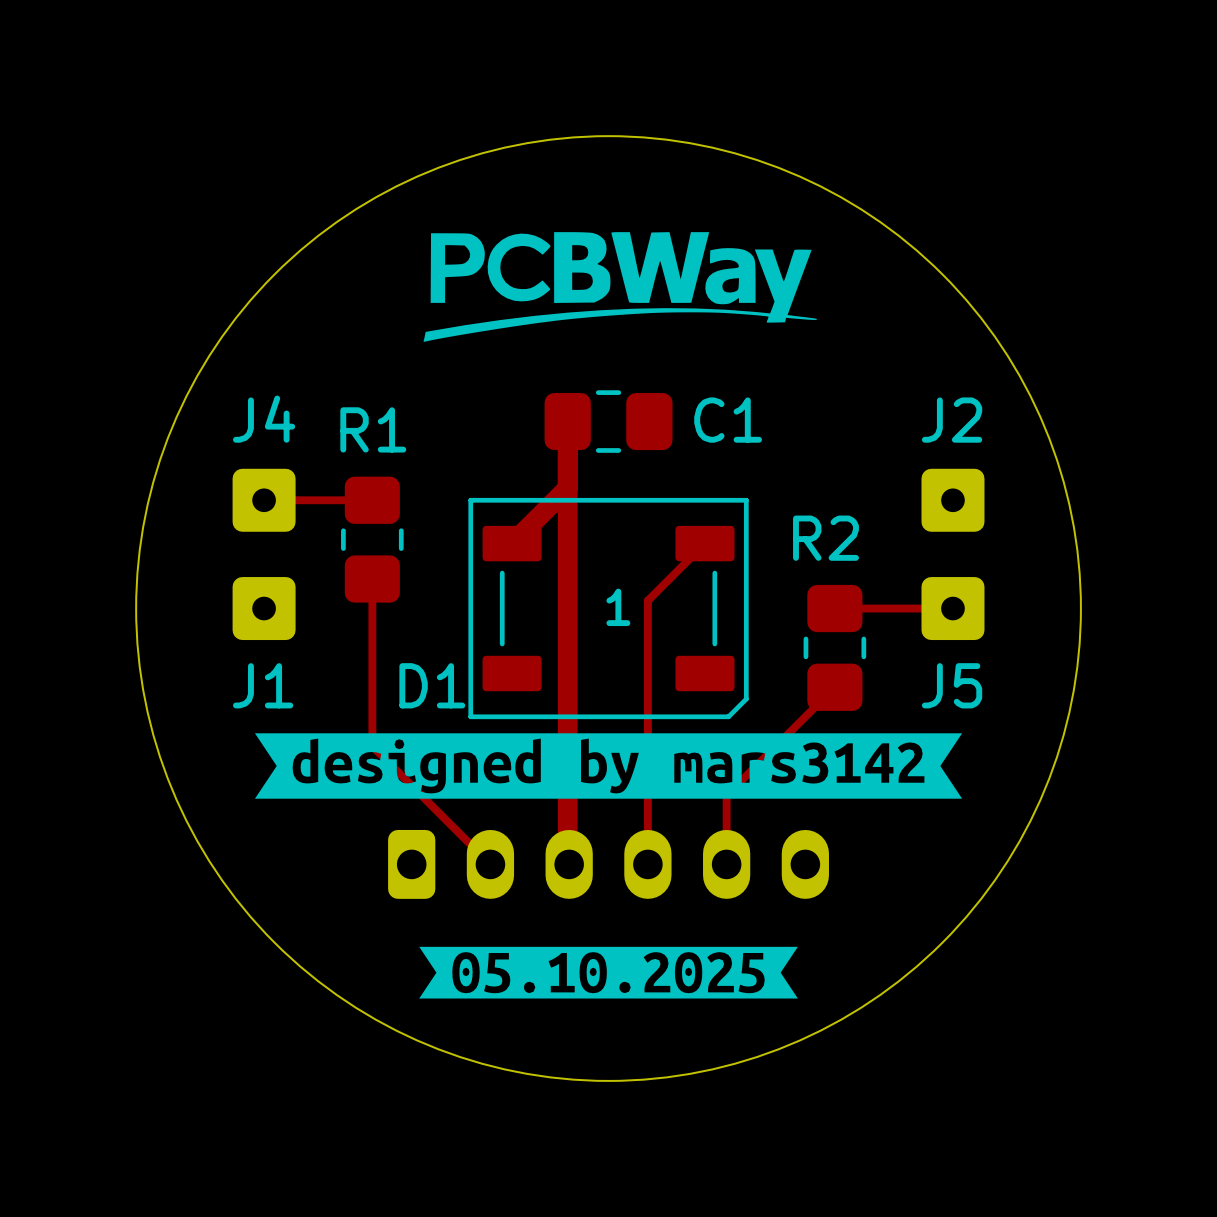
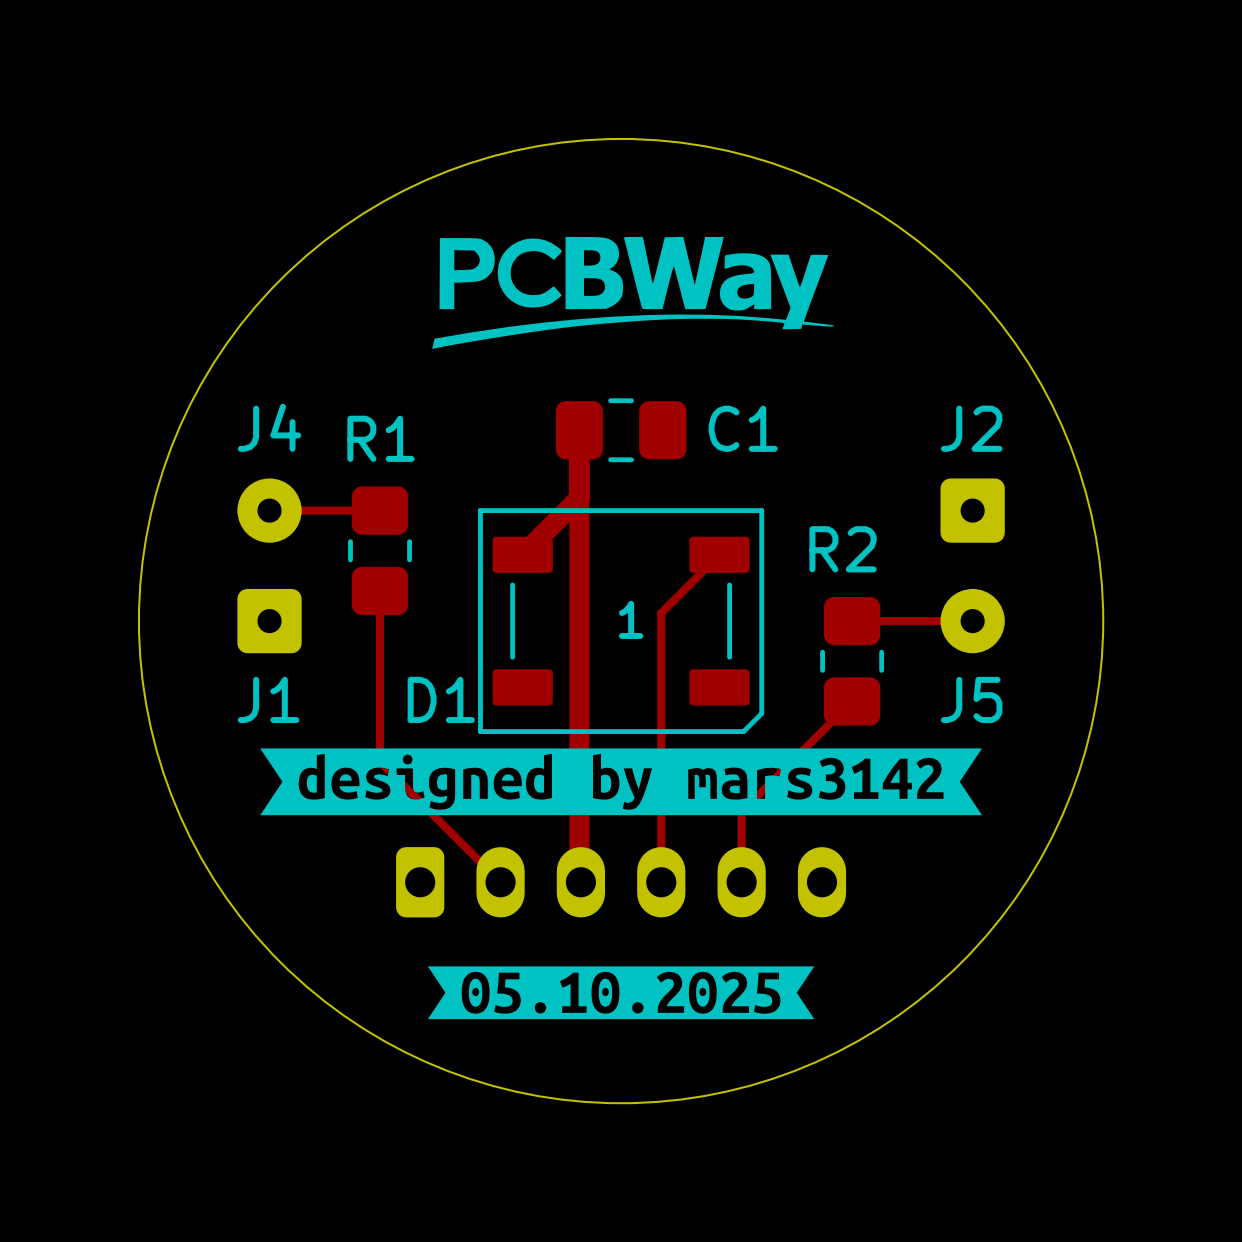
J4 footprint: [232, 468, 296, 532] -> [237, 478, 302, 543]
J5 footprint: [921, 577, 985, 641] -> [940, 588, 1005, 654]

